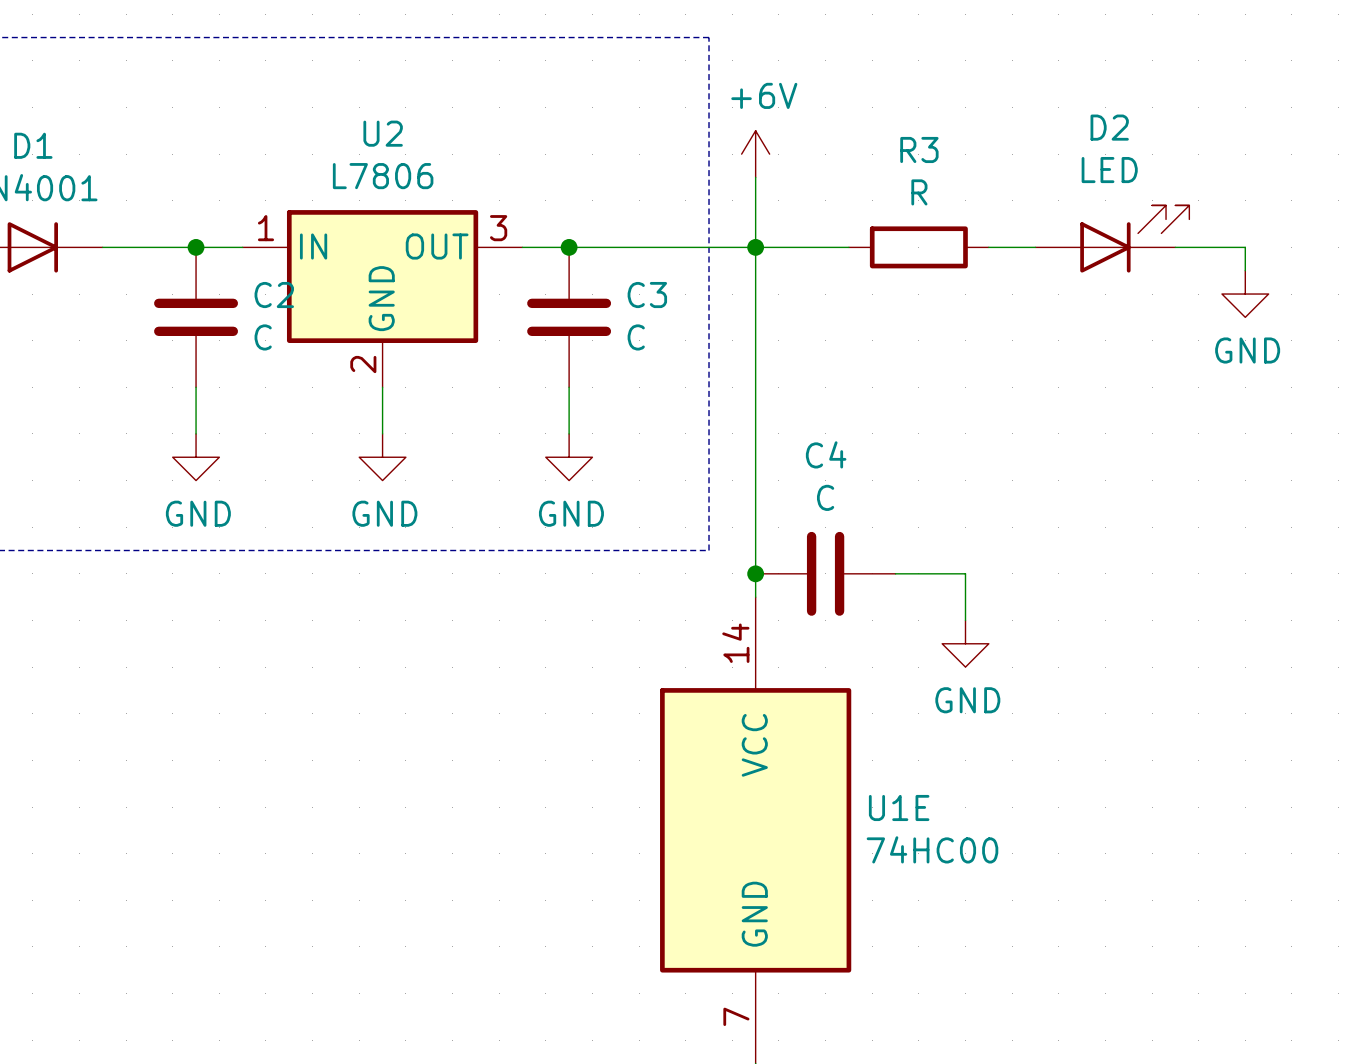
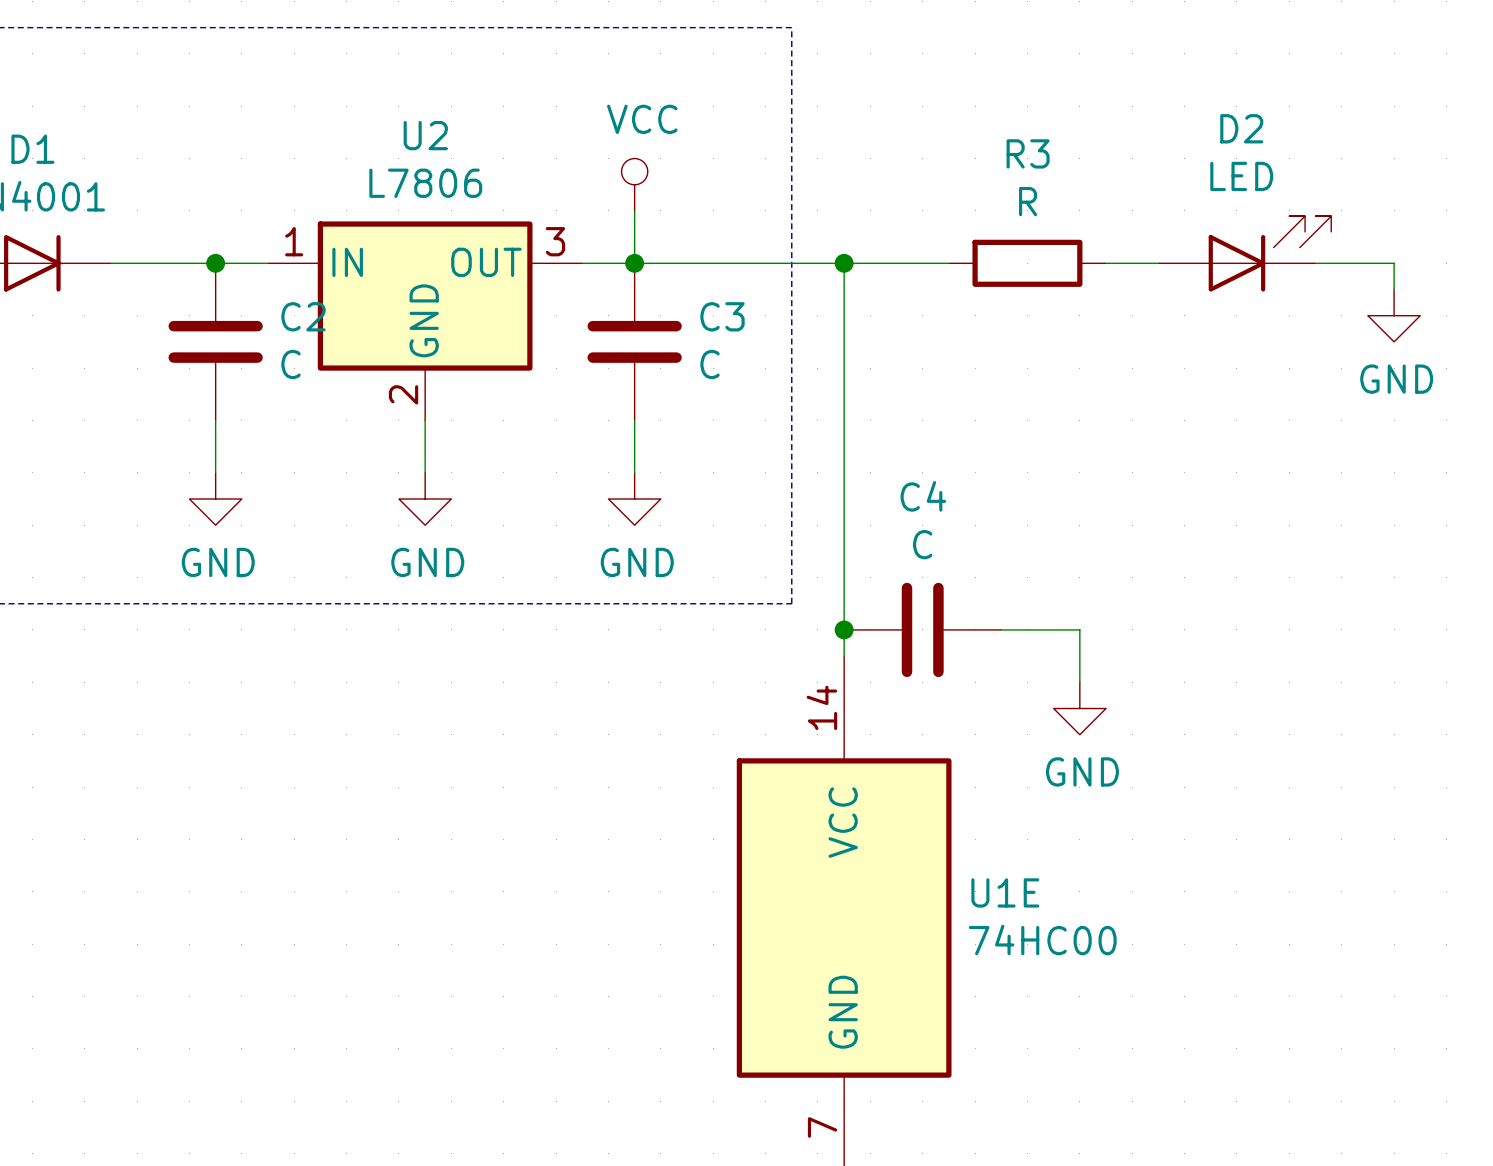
power symbol: +6V (755, 154) -> none
power symbol: none -> VCC (634, 184)
wire: (755, 177) (755, 247) -> none
wire: none -> (634, 210) (634, 263)

